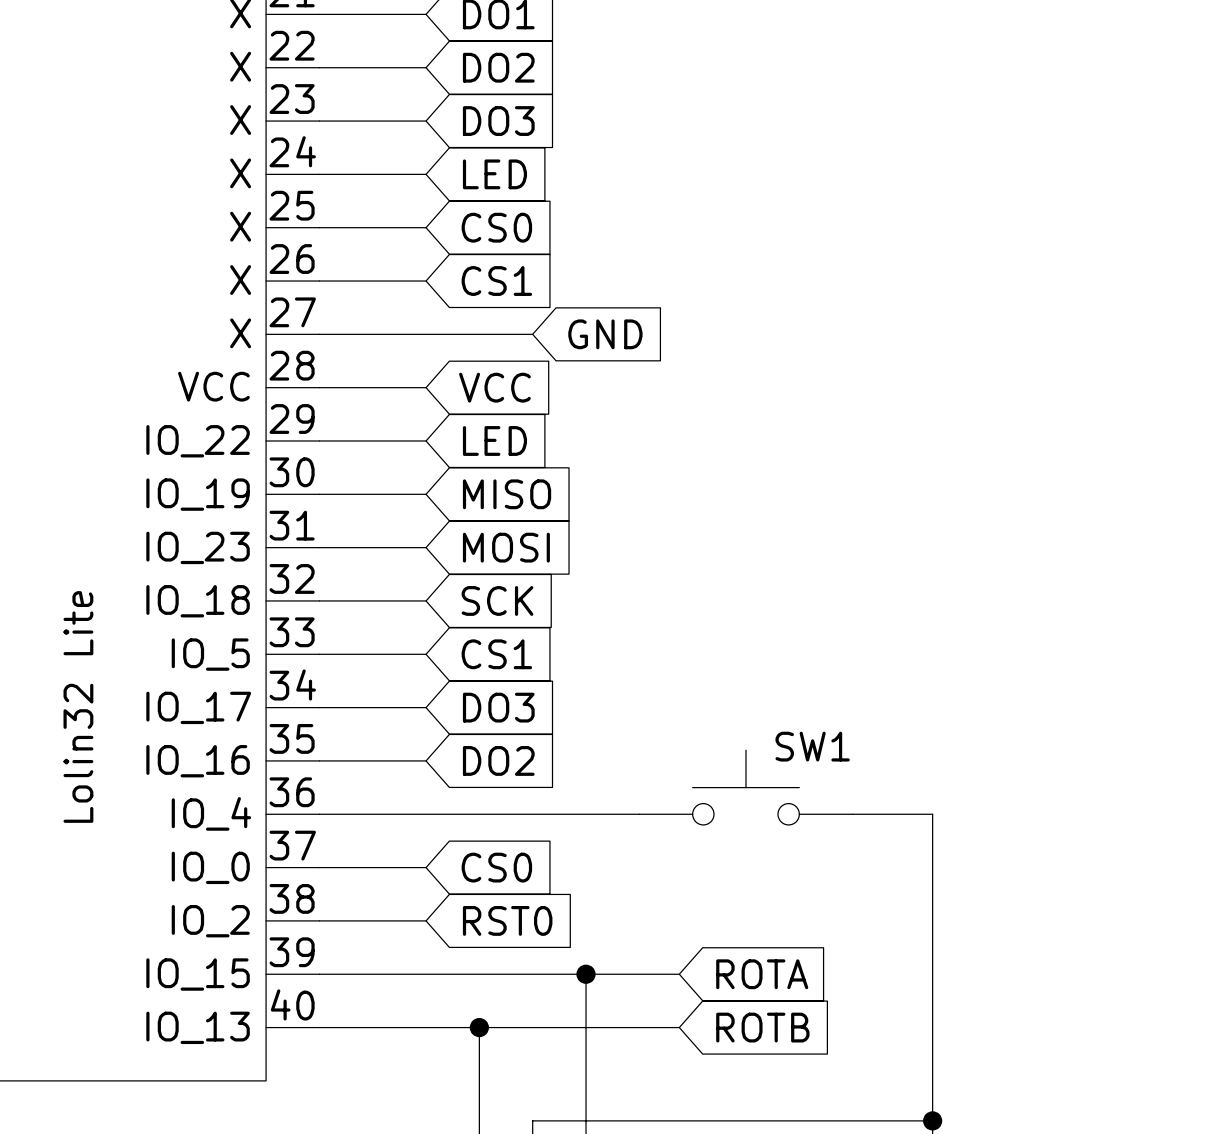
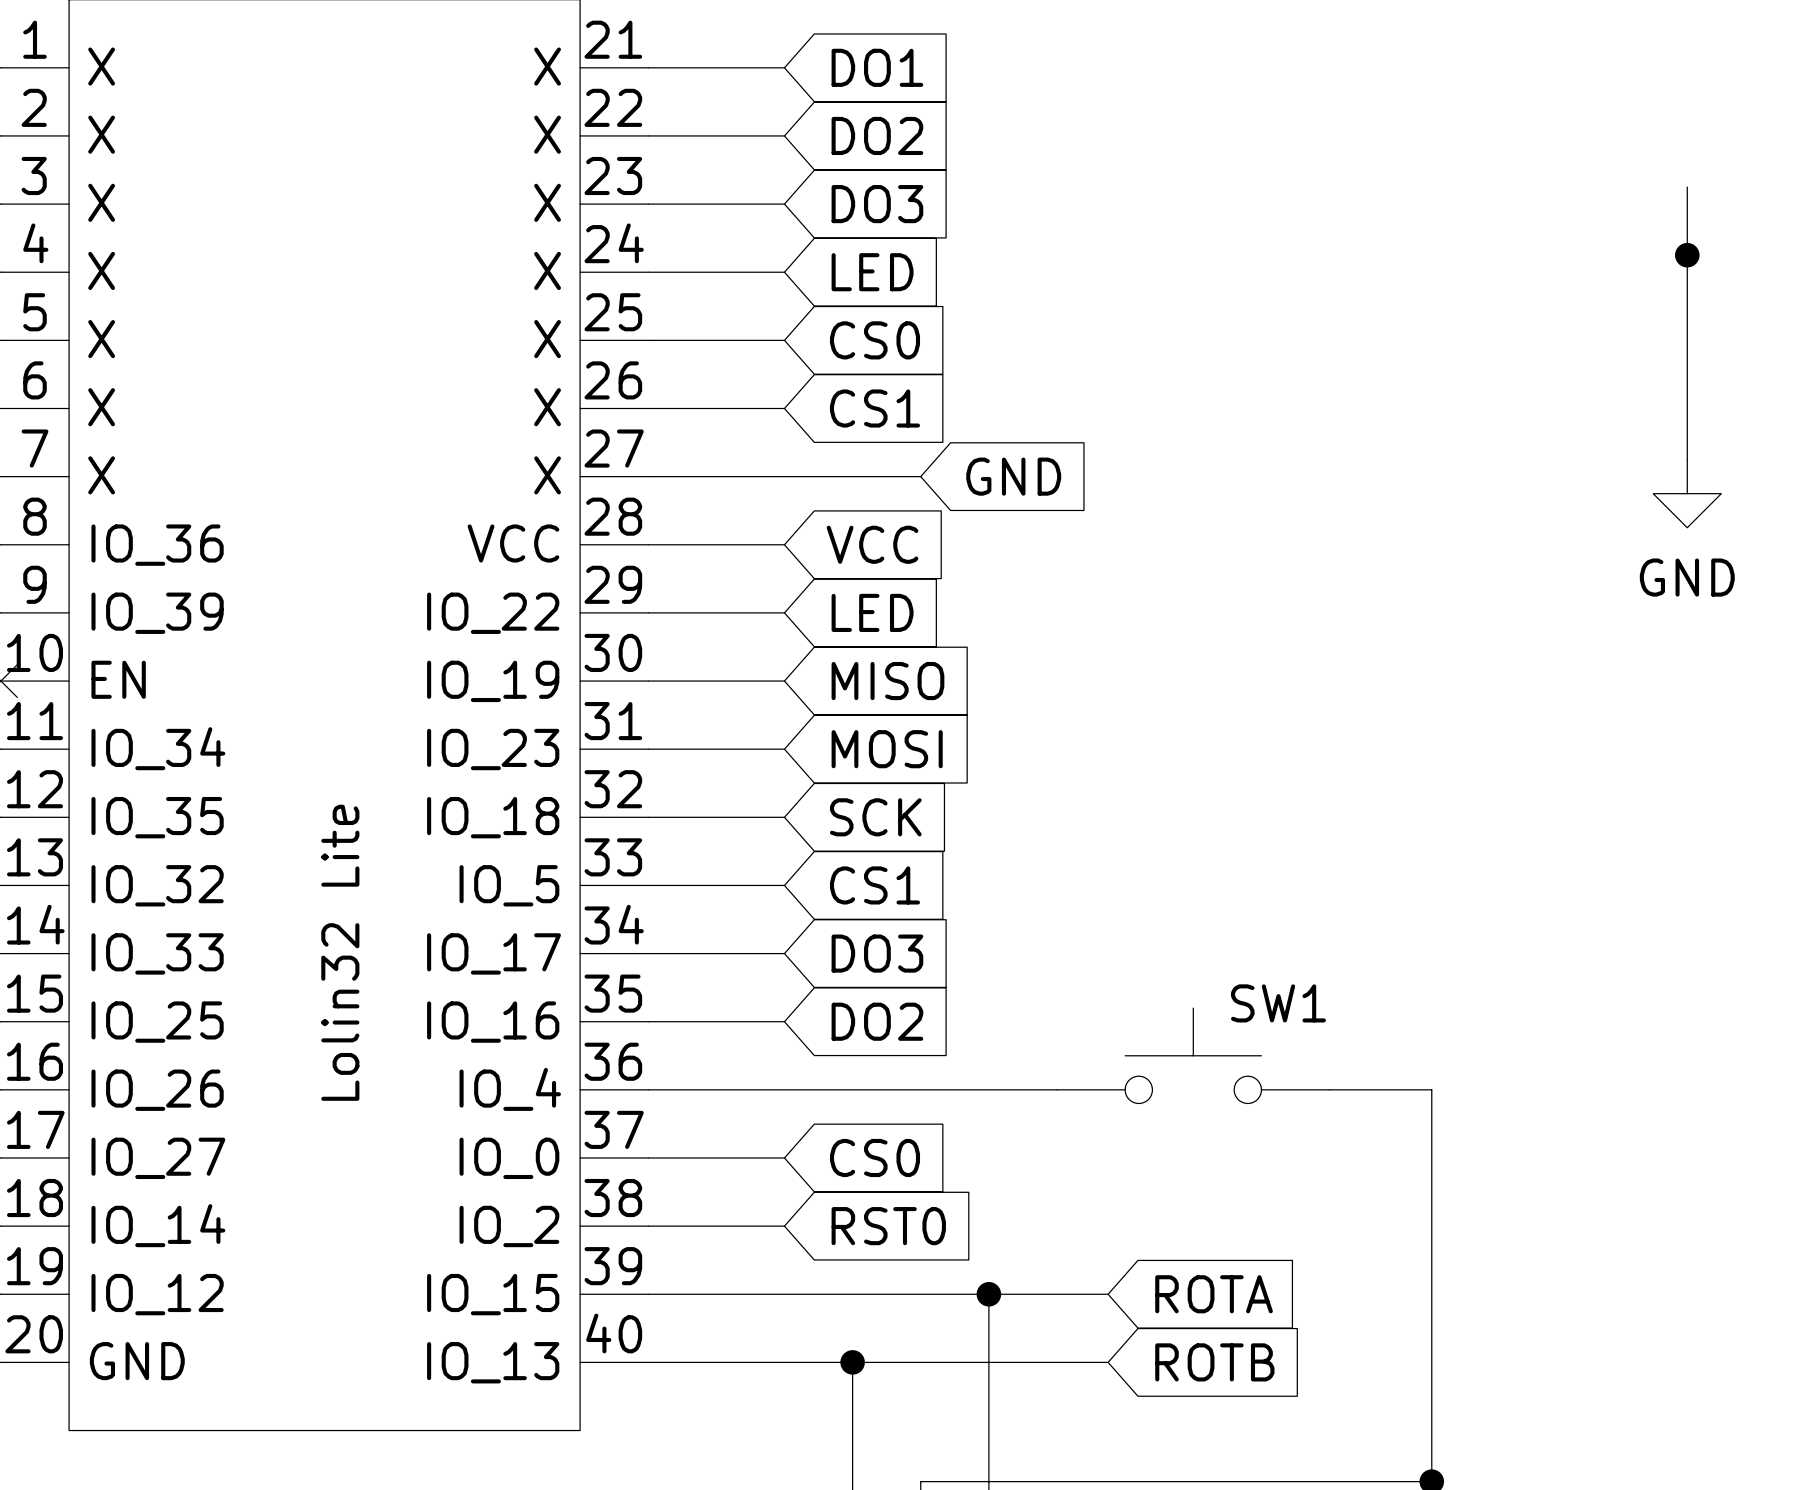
wire: none -> (1687, 187) (1687, 459)
junction: none -> (1687, 255)
power symbol: none -> GND (1687, 493)

